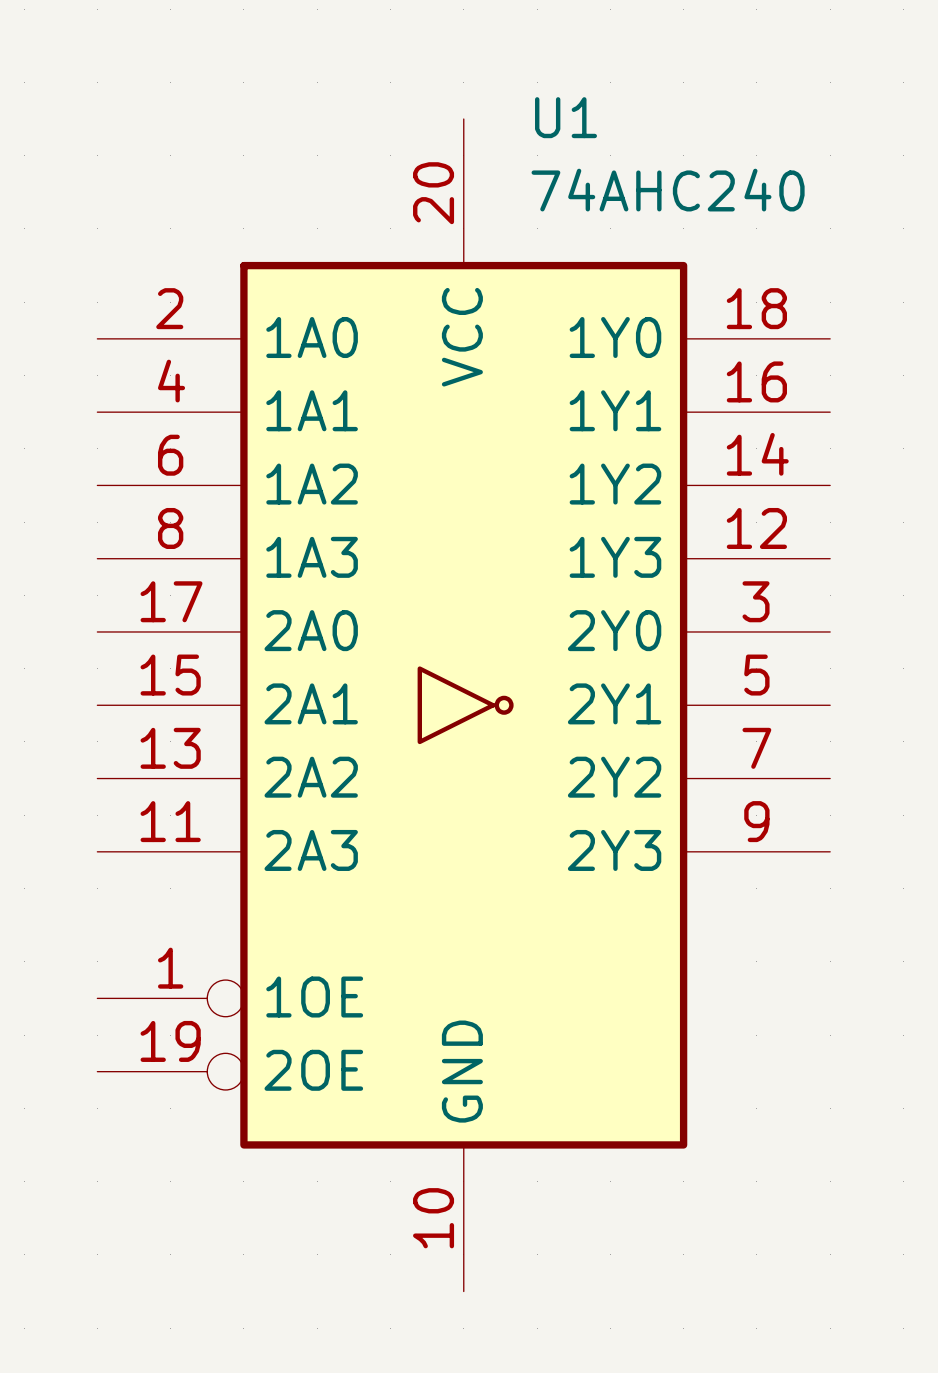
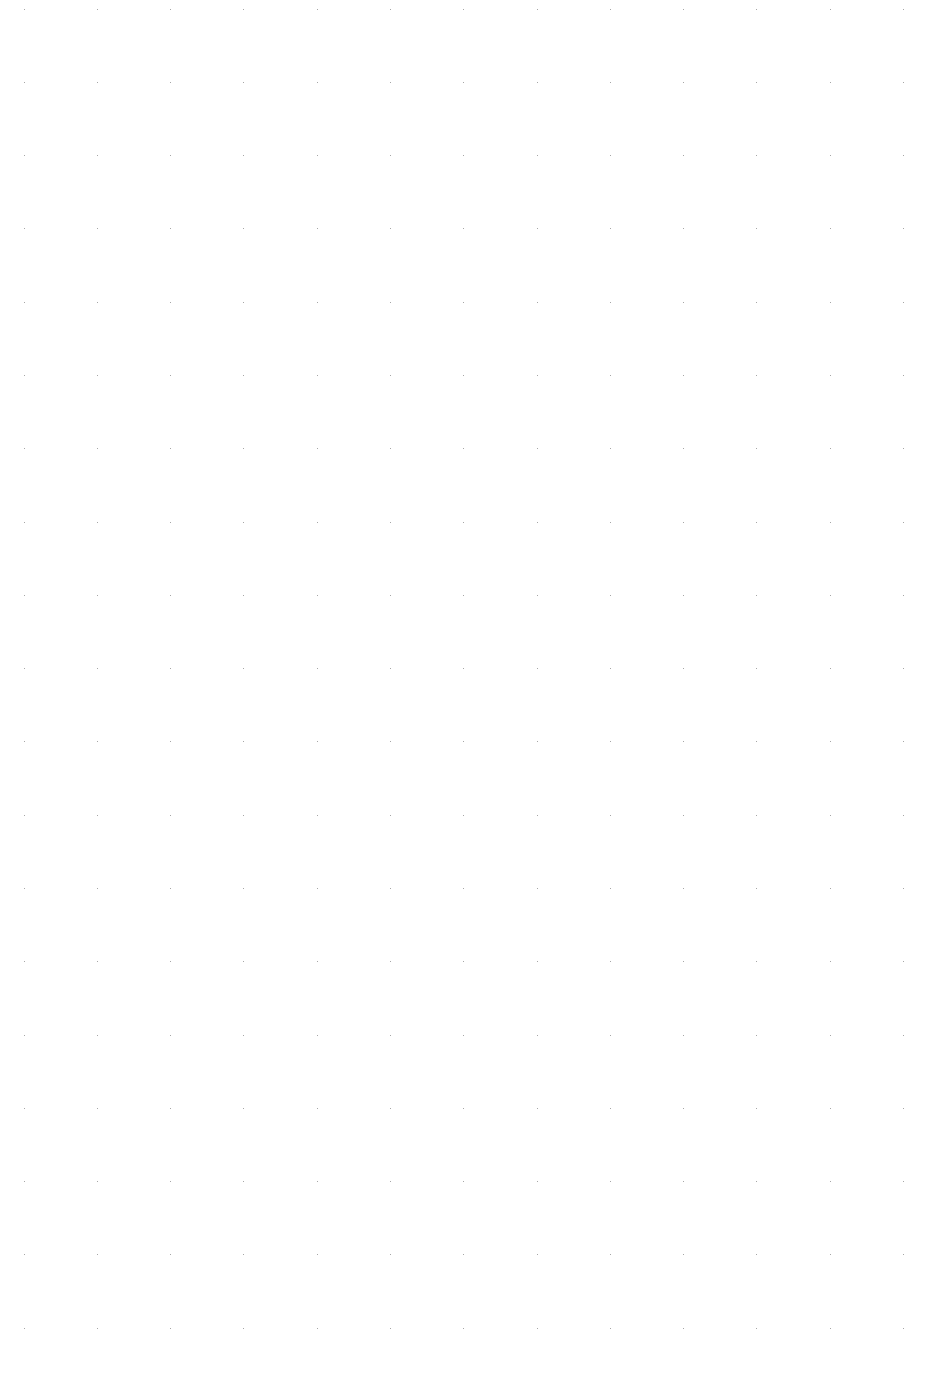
U1: 74AHC240 (463, 705) -> none

